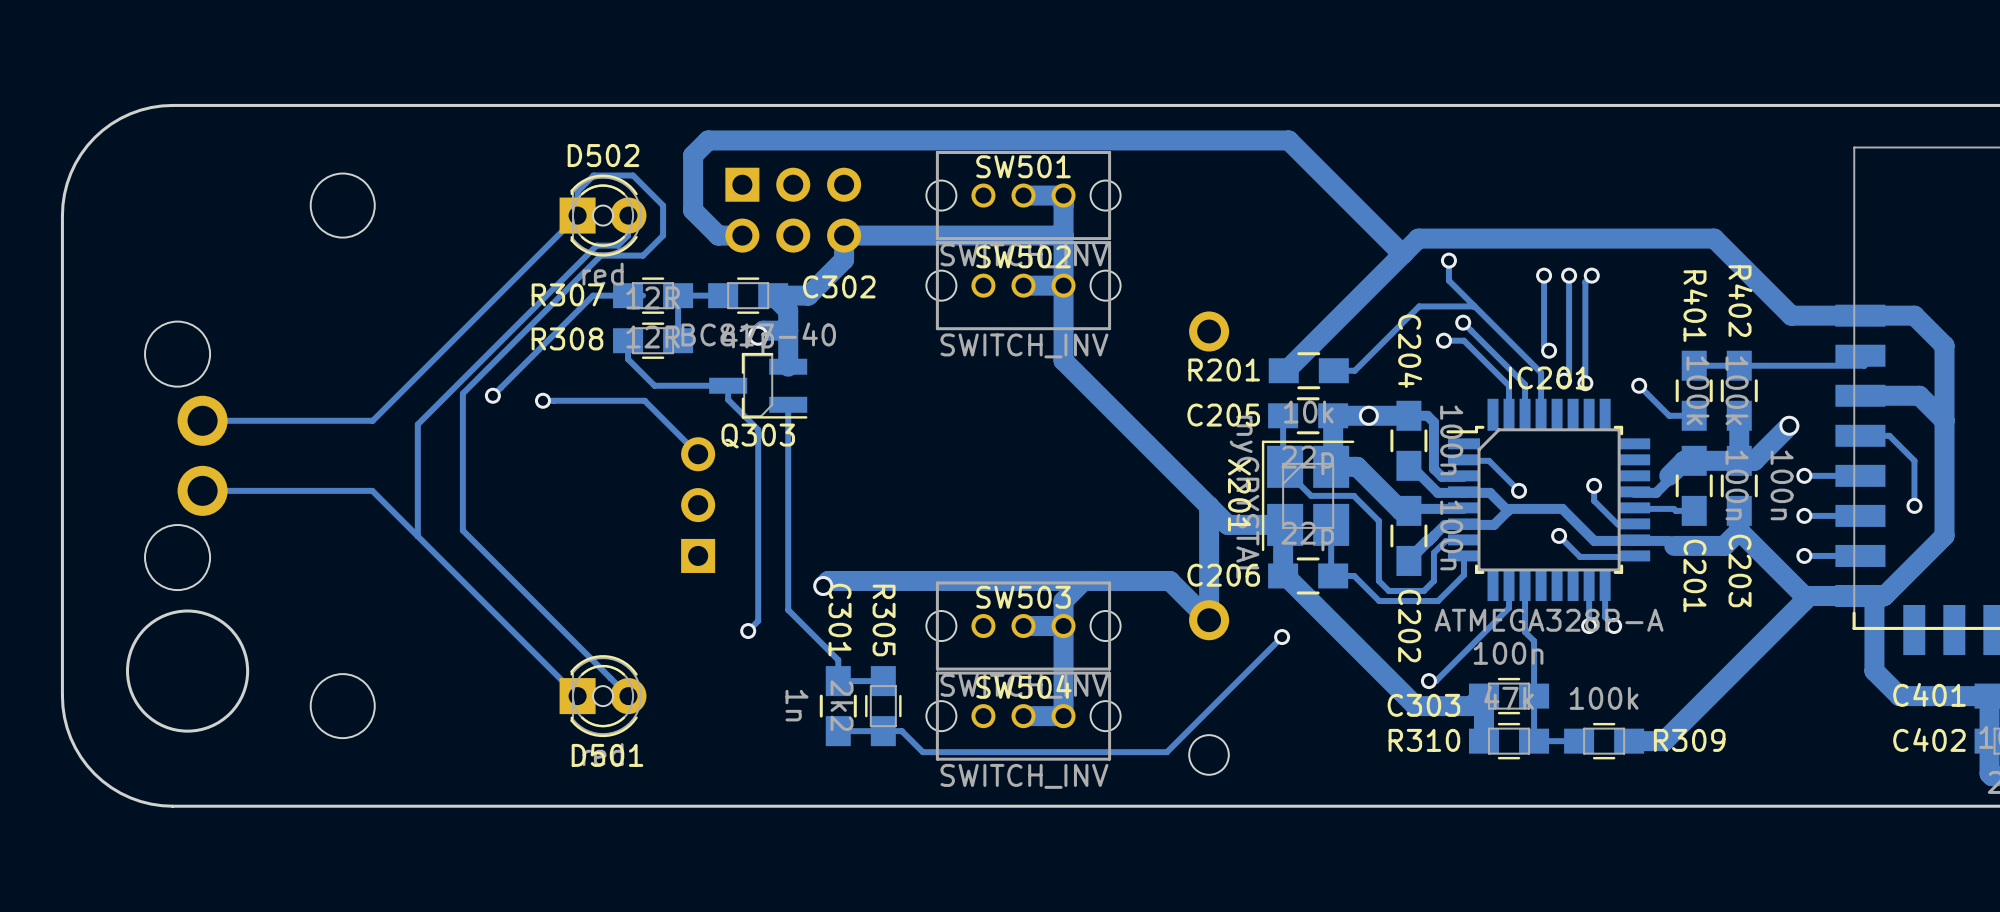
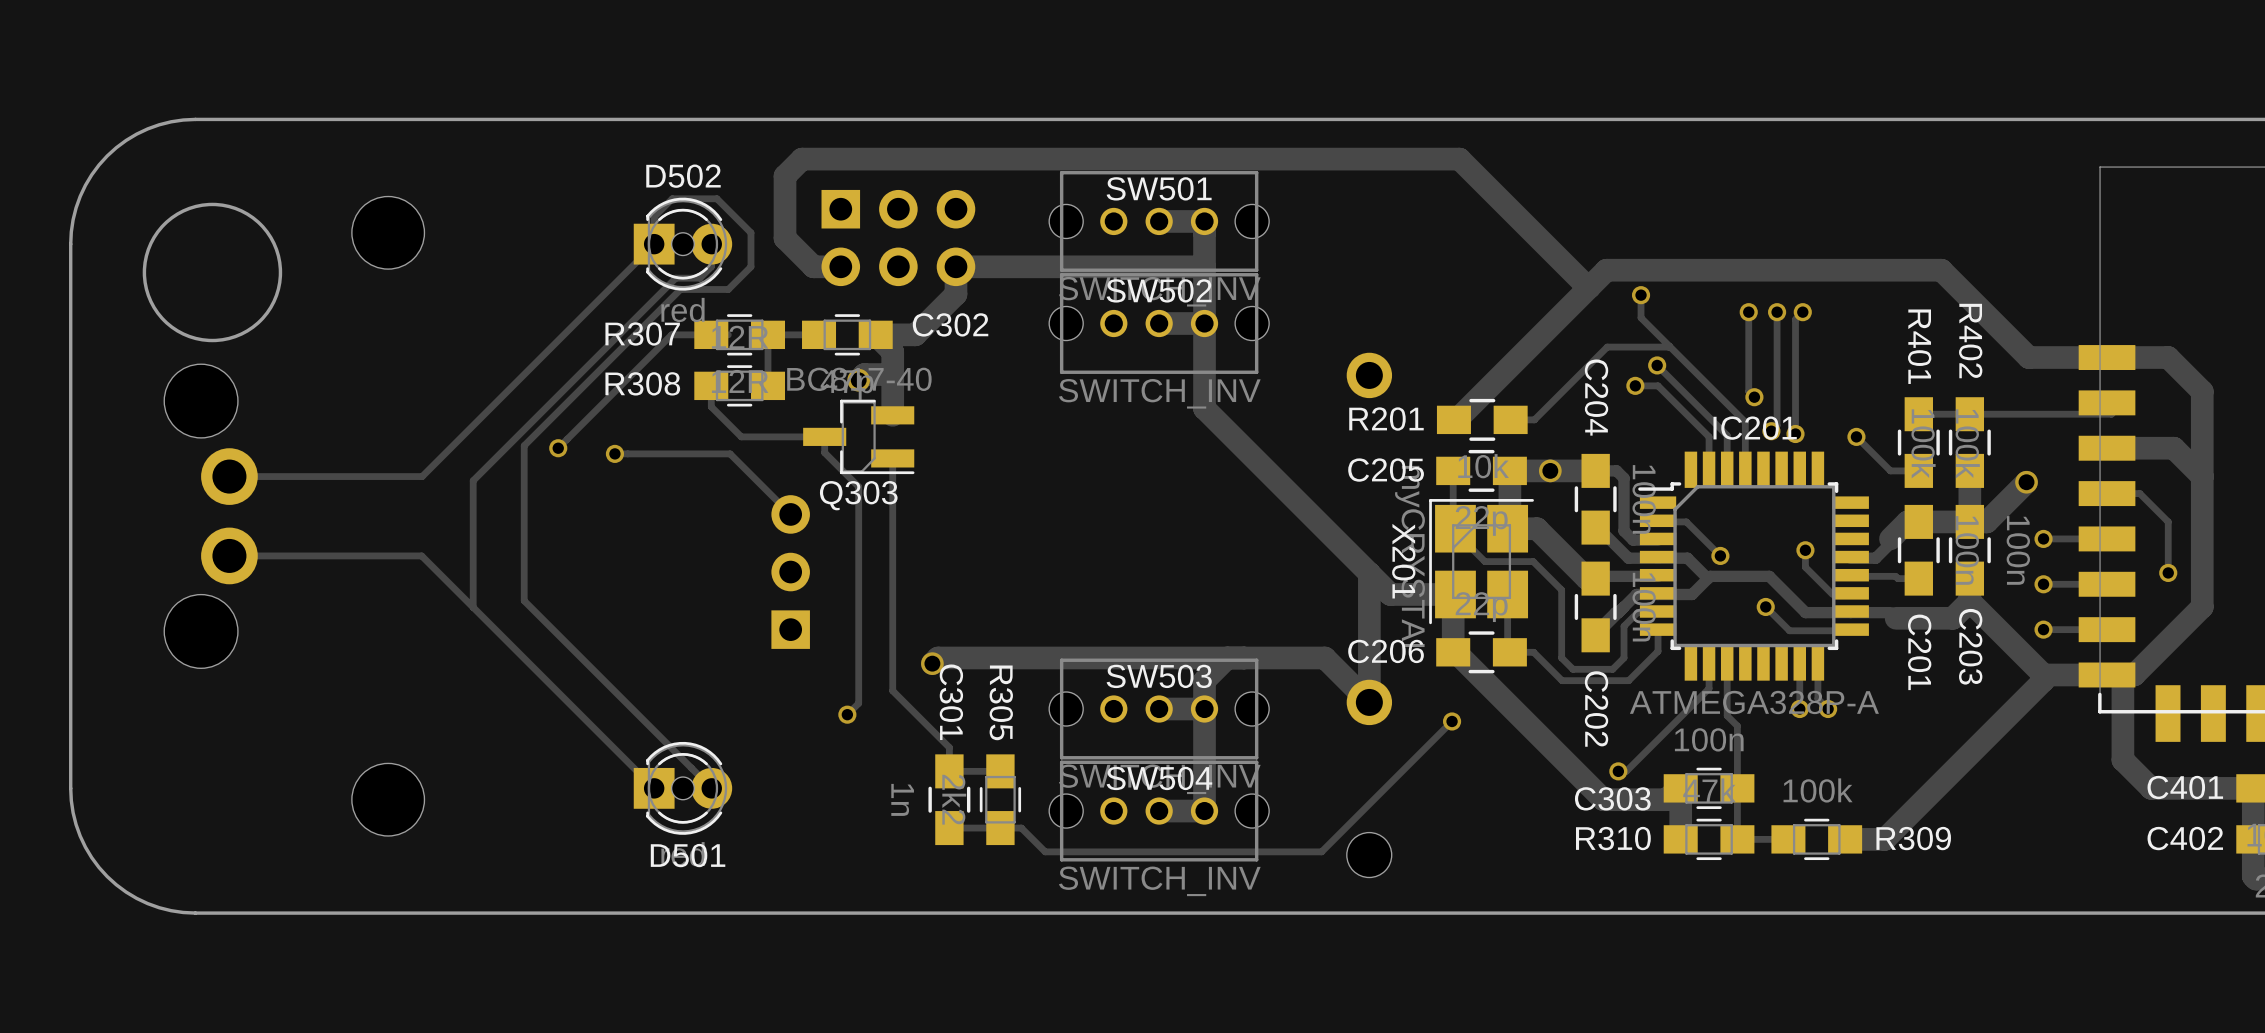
round board edge position: (187, 671) -> (212, 272)

